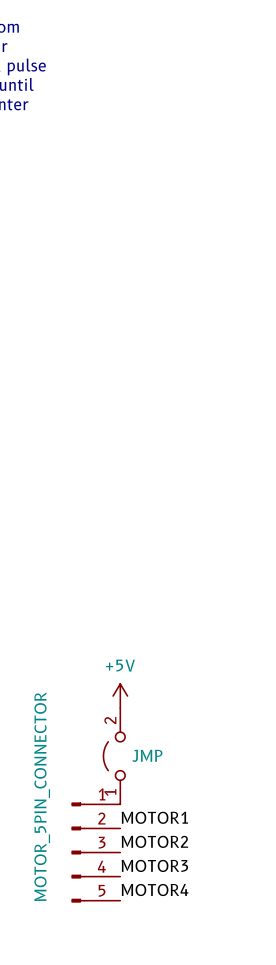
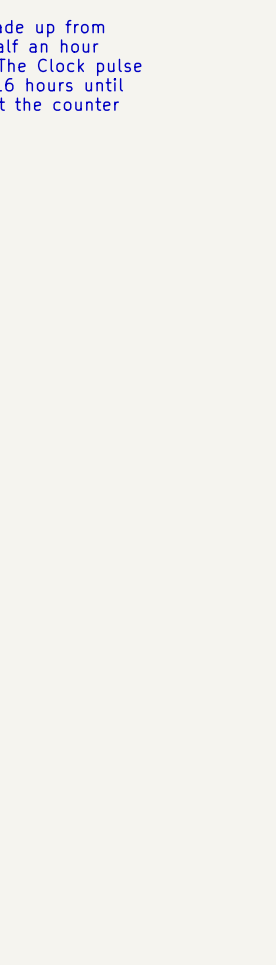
power symbol: +5V (120, 696) -> none
part: JMP (114, 756) -> none
label: MOTOR1 (154, 817) -> none
label: MOTOR2 (154, 841) -> none
part: MOTOR_5PIN_CONNECTOR (95, 852) -> none
label: MOTOR3 (154, 865) -> none
label: MOTOR4 (155, 890) -> none

